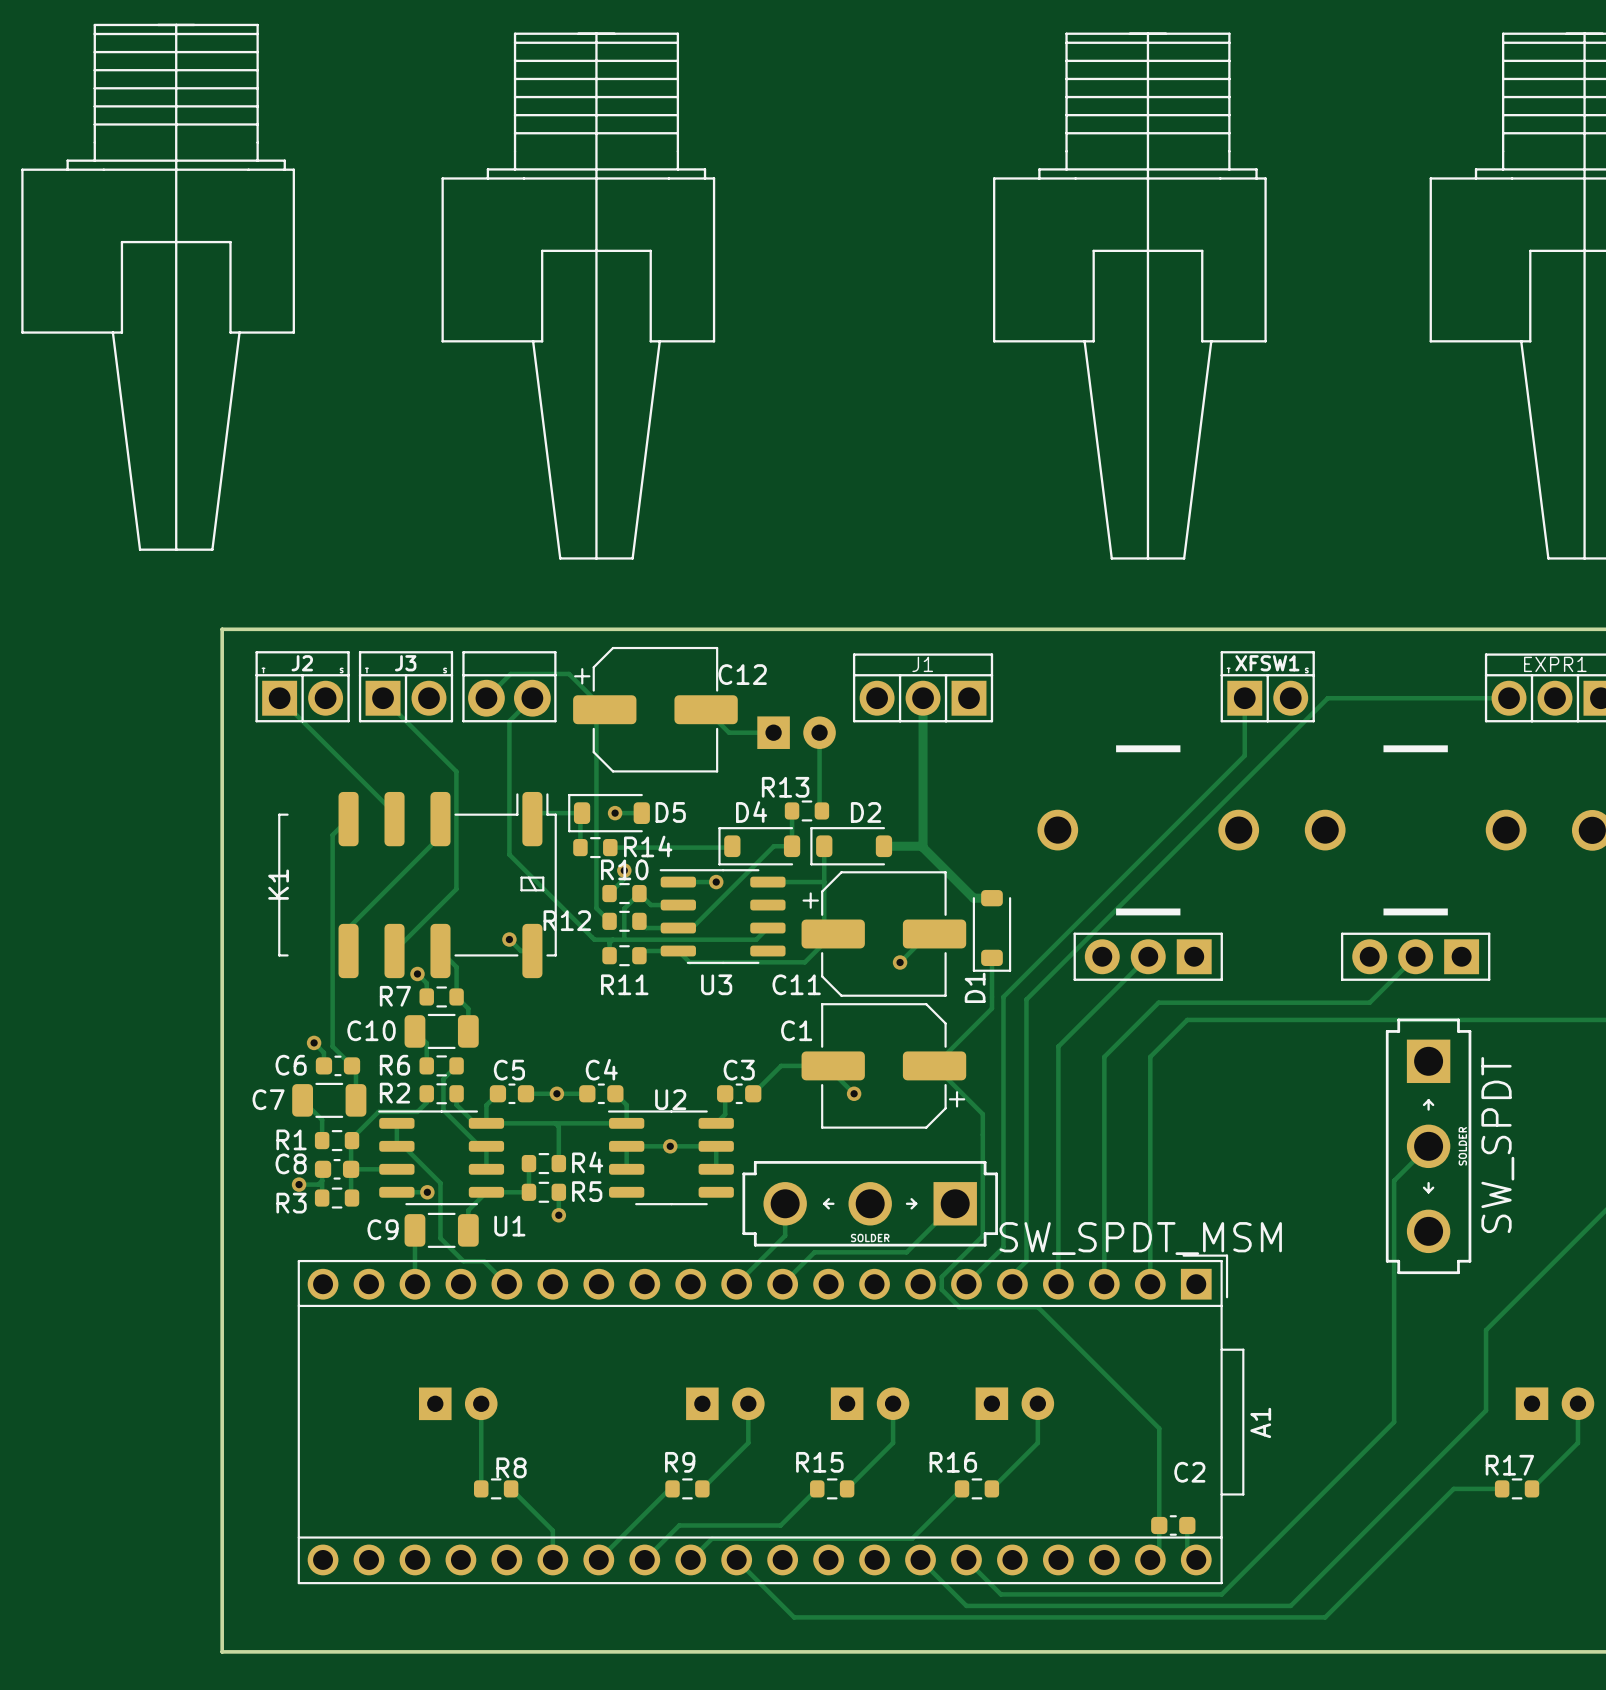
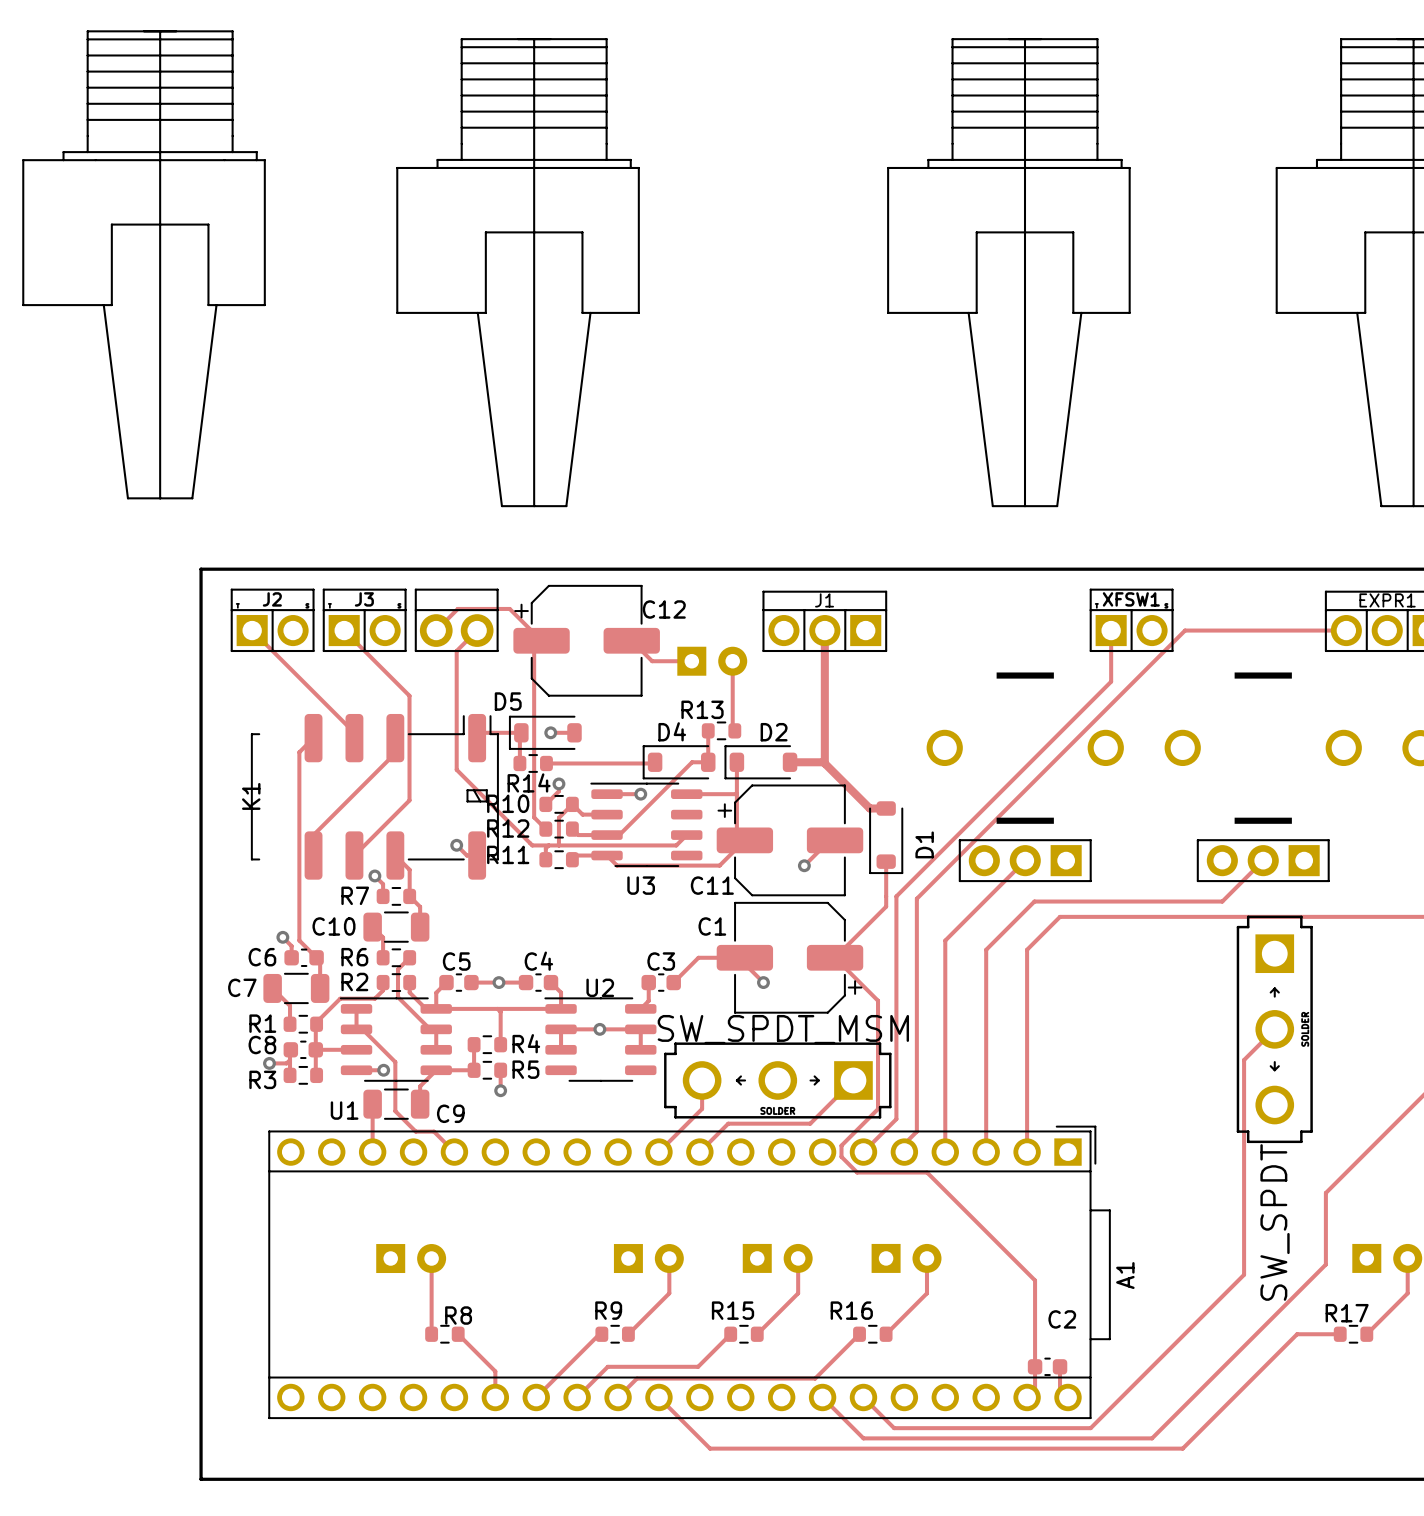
D5 name position: D5 (670, 812) -> D5 (508, 701)
R14 name position: R14 (648, 846) -> R14 (529, 782)
R10 name position: R10 (624, 869) -> R10 (508, 803)
R11 name position: R11 (624, 984) -> R11 (508, 854)
D1 name position: D1 (975, 987) -> D1 (924, 844)
part value position: SW_SPDT (1497, 1145) -> SW_SPDT (1275, 1222)
U1 name position: U1 (509, 1226) -> U1 (344, 1110)
C9 name position: C9 (383, 1229) -> C9 (450, 1113)
part value position: SW_SPDT_MSM (1140, 1238) -> SW_SPDT_MSM (783, 1029)

